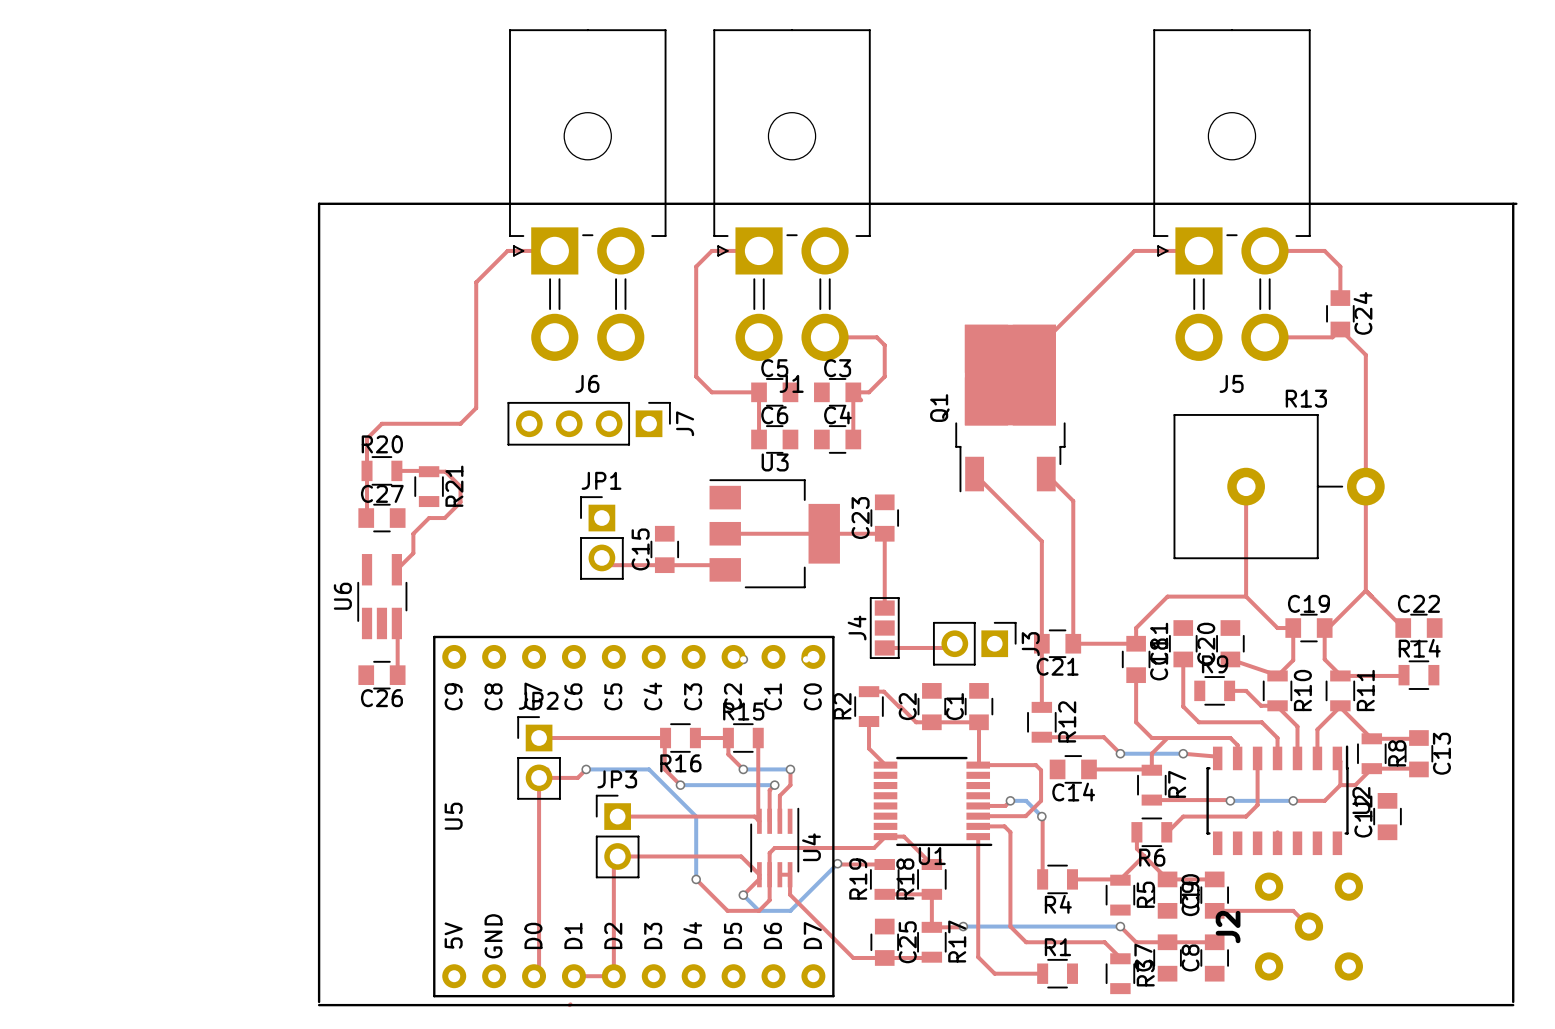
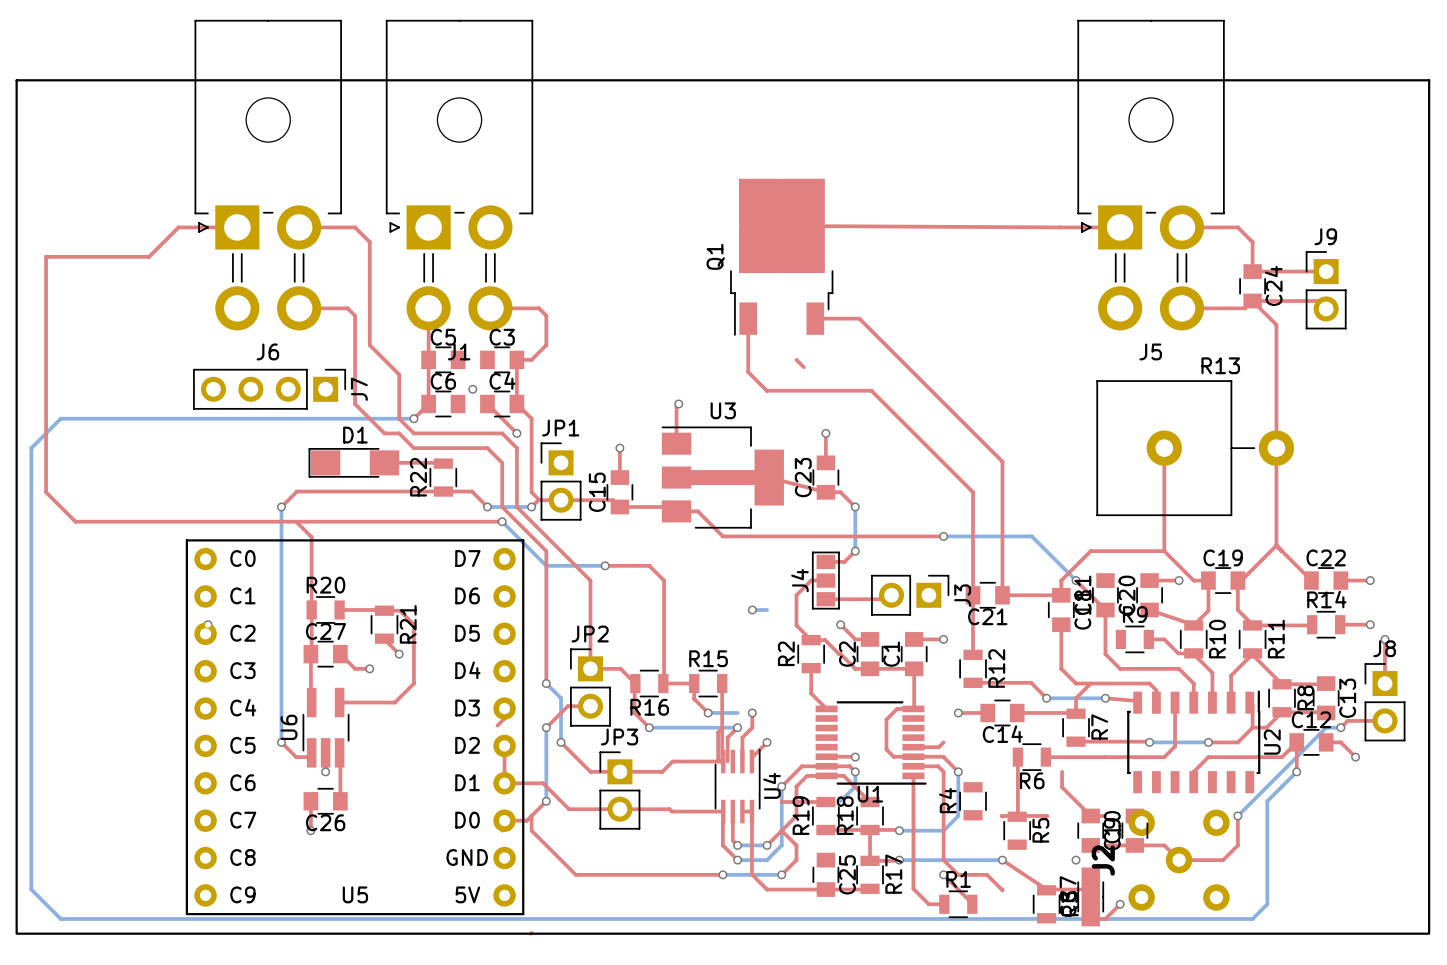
J6 position: (587, 195) -> (268, 175)
J1 position: (792, 195) -> (459, 175)
board edge: (1513, 203) (1513, 1001) -> none
board edge: (1516, 203) (319, 203) (319, 1001) -> none
top track: none -> (237, 227) (178, 227) (149, 256) (46, 256) (46, 492) (75, 521) (502, 521)
top track: none -> (299, 227) (355, 227) (369, 242) (369, 345) (399, 374) (399, 418) (413, 433) (502, 433) (516, 448) (516, 506) (590, 580) (590, 668) (620, 668) (635, 683)
top track: (554, 250) (507, 250) (476, 282) (476, 408) (460, 423) (381, 423) (367, 438) (367, 518) -> none
top track: (759, 250) (711, 250) (696, 266) (696, 376) (711, 392) (759, 392) (759, 439) -> none
top track: (1134, 250) (1010, 375) (1012, 376) -> (1059, 227) (781, 225) (783, 227)
top track: none -> (1252, 271) (1326, 271)
J9: none -> (1326, 290)
top track: none -> (1252, 301) (1318, 301) (1326, 308)
top track: none -> (428, 308) (428, 404) (413, 418)
top track: none -> (490, 308) (538, 308) (546, 315) (546, 345) (531, 359) (516, 359) (516, 404) (531, 418) (531, 492) (539, 500)
top track: (825, 337) (876, 337) (884, 345) (884, 376) (869, 392) (853, 392) (853, 439) -> none
top track: none -> (815, 318) (859, 318) (977, 436)
C5 position: (774, 392) -> (443, 359)
C3 position: (837, 392) -> (502, 359)
Q1 position: (1010, 408) -> (781, 257)
via: none -> (472, 389)
J7 position: (589, 423) -> (269, 389)
top track: none -> (487, 404) (516, 433)
top track: none -> (678, 404) (676, 406) (676, 443)
via: none -> (678, 404)
C6 position: (774, 439) -> (443, 404)
C4 position: (837, 439) -> (502, 404)
bottom track: none -> (413, 418) (60, 418) (31, 448) (31, 889) (60, 918) (1252, 918) (1267, 904) (1267, 801) (1296, 771)
via: none -> (413, 418)
R20 position: (381, 470) -> (325, 609)
top track: (396, 470) (413, 470) -> (299, 308) (347, 308) (355, 315) (355, 404) (384, 433)
top track: (428, 470) (445, 471) (460, 486) (460, 502) (444, 518) (429, 518) (413, 533) (413, 553) (396, 569) -> (398, 433) (413, 448) (487, 448) (502, 462) (502, 506) (546, 551) (546, 683)
via: none -> (516, 433)
top track: none -> (825, 433) (825, 462)
via: none -> (825, 433)
top track: (974, 474) (1041, 541) -> (748, 318) (748, 372) (766, 390) (871, 390) (973, 492) (973, 499)
R21 position: (429, 486) -> (384, 624)
top track: none -> (619, 448) (619, 477)
via: none -> (619, 448)
D1: none -> (353, 462)
top track: none -> (384, 462) (443, 463)
C27 position: (381, 518) -> (325, 654)
R22: none -> (443, 477)
top track: none -> (676, 477) (769, 477) (825, 492) (840, 492) (855, 506)
top track: (725, 533) (884, 533) (884, 608) -> (855, 551) (844, 561) (825, 561)
U3 position: (774, 533) -> (722, 477)
JP1 position: (601, 537) -> (561, 481)
top track: none -> (281, 506) (296, 491) (472, 491) (487, 506)
bottom track: none -> (281, 506) (281, 742)
via: none -> (281, 506)
bottom track: none -> (487, 506) (531, 506)
via: none -> (487, 506)
top track: none -> (531, 506) (538, 500) (613, 500) (619, 506) (672, 506) (676, 511)
via: none -> (531, 506)
C15 position: (664, 549) -> (619, 492)
bottom track: none -> (855, 506) (855, 551)
via: none -> (855, 506)
top track: none -> (676, 511) (697, 511) (722, 536) (943, 536)
top track: (601, 557) (609, 565) (720, 565) (725, 569) (725, 578) -> none
top track: none -> (296, 521) (311, 537) (310, 654)
bottom track: none -> (502, 521) (546, 565) (605, 565)
via: none -> (502, 521)
bottom track: none -> (943, 536) (1031, 536) (1076, 580)
via: none -> (943, 536)
U6 position: (382, 596) -> (325, 727)
via: none -> (855, 551)
top track: none -> (605, 565) (649, 565) (664, 580) (663, 682)
via: none -> (605, 565)
top track: (397, 628) (396, 623) (397, 675) -> (340, 757) (339, 752) (340, 801)
top track: none -> (825, 580) (811, 580) (796, 595) (796, 625) (811, 640)
top track: none -> (1076, 580) (1105, 609)
via: none -> (1076, 580)
top track: none -> (1149, 580) (1179, 580)
via: none -> (1179, 580)
top track: none -> (1340, 580) (1370, 580)
via: none -> (1370, 580)
top track: none -> (339, 609) (399, 610) (413, 624) (413, 683) (394, 702) (339, 702)
via: (743, 659) -> none
via: none -> (207, 624)
C26 position: (381, 675) -> (325, 801)
top track: none -> (840, 624) (855, 639) (870, 639)
via: none -> (840, 624)
top track: none -> (1340, 624) (1370, 624)
via: none -> (1370, 624)
top track: none -> (384, 638) (399, 654)
top track: none -> (914, 639) (943, 639)
via: none -> (943, 639)
top track: none -> (1385, 639) (1385, 683)
via: none -> (1385, 639)
top track: none -> (310, 654) (311, 702)
top track: none -> (340, 654) (355, 668) (369, 668)
via: none -> (399, 654)
via: none -> (369, 668)
top track: (695, 737) (711, 738) -> none
top track: (539, 738) (665, 738) -> none
bottom track: none -> (546, 683) (561, 698) (561, 742)
via: none -> (546, 683)
top track: (665, 738) (664, 769) (680, 785) -> (635, 683) (634, 712) (649, 727)
R16 position: (680, 738) -> (649, 683)
top track: (728, 738) (728, 754) (743, 769) -> (679, 683) (694, 683) (694, 699) (708, 712)
R15 position: (743, 738) -> (708, 683)
top track: (758, 738) (758, 820) -> none
top track: none -> (722, 683) (721, 761) (672, 761) (662, 771) (590, 771) (561, 742)
JP2 position: (539, 757) -> (590, 687)
J8: none -> (1385, 702)
top track: none -> (590, 706) (567, 706) (546, 727)
top track: (978, 765) (1035, 765) (1041, 770) (1041, 800) (1025, 816) (1010, 816) -> (913, 708) (897, 708) (886, 719) (886, 749) (893, 756) (913, 756)
top track: (586, 769) (577, 777) (539, 777) (539, 879) -> none
bottom track: (586, 769) (649, 769) (696, 816) (696, 879) -> none
via: (586, 769) -> none
bottom track: (743, 769) (759, 769) -> (722, 727) (737, 727)
via: (743, 769) -> none
via: none -> (708, 712)
top track: (790, 769) (790, 785) -> none
via: (790, 769) -> none
top track: none -> (752, 712) (752, 727) (742, 737) (742, 761)
via: none -> (752, 712)
via: none -> (958, 712)
top track: none -> (1385, 720) (1347, 720) (1340, 727)
bottom track: none -> (546, 727) (546, 801)
via: none -> (546, 727)
bottom track: (680, 785) (696, 785) -> none
via position: (680, 785) -> (649, 727)
via: (774, 785) -> none
via: none -> (737, 727)
bottom track: none -> (1340, 727) (1326, 727) (1237, 815)
via: none -> (1340, 727)
top track: none -> (281, 742) (296, 757) (307, 757) (311, 752)
via: none -> (281, 742)
via: none -> (561, 742)
top track: none -> (767, 742) (751, 757) (751, 761)
via: none -> (767, 742)
bottom track: (1010, 800) (1026, 800) (1041, 816) -> none
via: (1010, 800) -> none
top track: none -> (1326, 742) (1340, 742) (1355, 757)
top track: none -> (504, 745) (504, 783) (543, 783) (568, 809) (669, 809) (671, 811) (723, 811) (722, 845) (737, 860)
top track: (617, 816) (754, 816) (759, 821) -> none
U5 rotation: 0° (633, 816) -> 90° counterclockwise (355, 727)
U5 position: (633, 816) -> (355, 727)
top track: none -> (826, 756) (855, 757)
via: none -> (855, 757)
top track: none -> (943, 756) (958, 771)
top track: (1041, 816) (1042, 879) -> none
via: (1041, 816) -> none
top track: none -> (1017, 757) (1017, 816)
top track: (1183, 816) (1166, 832) -> (1105, 757) (1045, 757)
C12 rotation: 0° (1387, 816) -> 90° clockwise (1311, 742)
via: none -> (1355, 757)
via: none -> (325, 771)
top track: none -> (855, 771) (849, 766) (801, 766) (781, 786)
bottom track: none -> (855, 771) (855, 786) (840, 801)
via: none -> (855, 771)
bottom track: none -> (958, 771) (958, 815) (943, 830) (899, 830)
via: none -> (958, 771)
R6 position: (1151, 832) -> (1031, 757)
top track: none -> (1193, 771) (1208, 757) (1282, 757) (1296, 742) (1296, 771)
via: none -> (1296, 771)
JP3 position: (617, 836) -> (619, 790)
top track: none -> (826, 775) (807, 775) (796, 786) (796, 815) (767, 845)
top track: (884, 837) (874, 847) (774, 847) (769, 853) (769, 900) (759, 910) (727, 910) (696, 879) -> none
U4 position: (774, 847) -> (737, 786)
bottom track: none -> (781, 786) (781, 845) (767, 860) (737, 860)
top track: (1143, 855) (1120, 880) -> none
top track: none -> (310, 801) (310, 830)
top track: none -> (546, 801) (526, 820) (504, 820) (499, 815)
via: none -> (546, 801)
bottom track: (837, 863) (790, 910) (759, 910) (743, 895) -> none
via position: (837, 863) -> (781, 786)
top track: (779, 874) (790, 874) (790, 894) (853, 957) -> (742, 811) (751, 811) (751, 874) (767, 889) (796, 889)
top track: none -> (732, 811) (732, 840) (737, 845)
top track: none -> (531, 815) (531, 830) (575, 874) (722, 874)
via: (696, 879) -> none
R4 rotation: 0° (1057, 879) -> 90° clockwise (973, 801)
top track: (1183, 879) (1214, 879) -> (1105, 845) (1134, 845)
via: none -> (1237, 815)
top track: none -> (870, 829) (899, 830)
via: none -> (310, 830)
top track: (539, 895) (539, 971) (534, 976) -> none
top track: (743, 895) (759, 879) (759, 874) (741, 856) (617, 856) (613, 860) (613, 976) (573, 976) -> none
via: (743, 895) -> none
top track: none -> (781, 830) (796, 845) (796, 860) (781, 874)
via: none -> (899, 830)
R5 position: (1120, 895) -> (1017, 830)
bottom track: none -> (737, 845) (767, 845)
via: none -> (737, 845)
via: none -> (767, 845)
top track: (1246, 910) (1293, 910) (1308, 926) -> (1164, 845) (1179, 860) (1223, 860) (1237, 845) (1237, 815)
via: none -> (737, 860)
top track: none -> (1002, 860) (1046, 889) (1090, 889)
bottom track: (1073, 926) (1120, 926) -> none
via: none -> (1002, 860)
top track: (1120, 926) (1136, 942) (1214, 942) -> none
via: (1120, 926) -> none
via: none -> (1076, 860)
J2 position: (1308, 926) -> (1179, 860)
bottom track: none -> (722, 874) (781, 874)
via: none -> (722, 874)
via: none -> (781, 874)
top track: none -> (943, 874) (972, 904)
via: none -> (943, 874)
top track: (1056, 942) (1104, 942) (1120, 958) -> (987, 874) (1002, 889)
C8 position: (1214, 957) -> (1090, 904)
top track: (1011, 973) (1042, 973) -> (958, 712) (987, 712)
R1 position: (1057, 973) -> (958, 904)
top track: none -> (1120, 904) (1105, 918) (1090, 918)
via: none -> (1120, 904)
board edge: none -> (16, 932) (16, 80) (1429, 80) (1429, 932)
board edge: none -> (16, 933) (296, 933)
board edge: none -> (1414, 933) (1429, 933)

